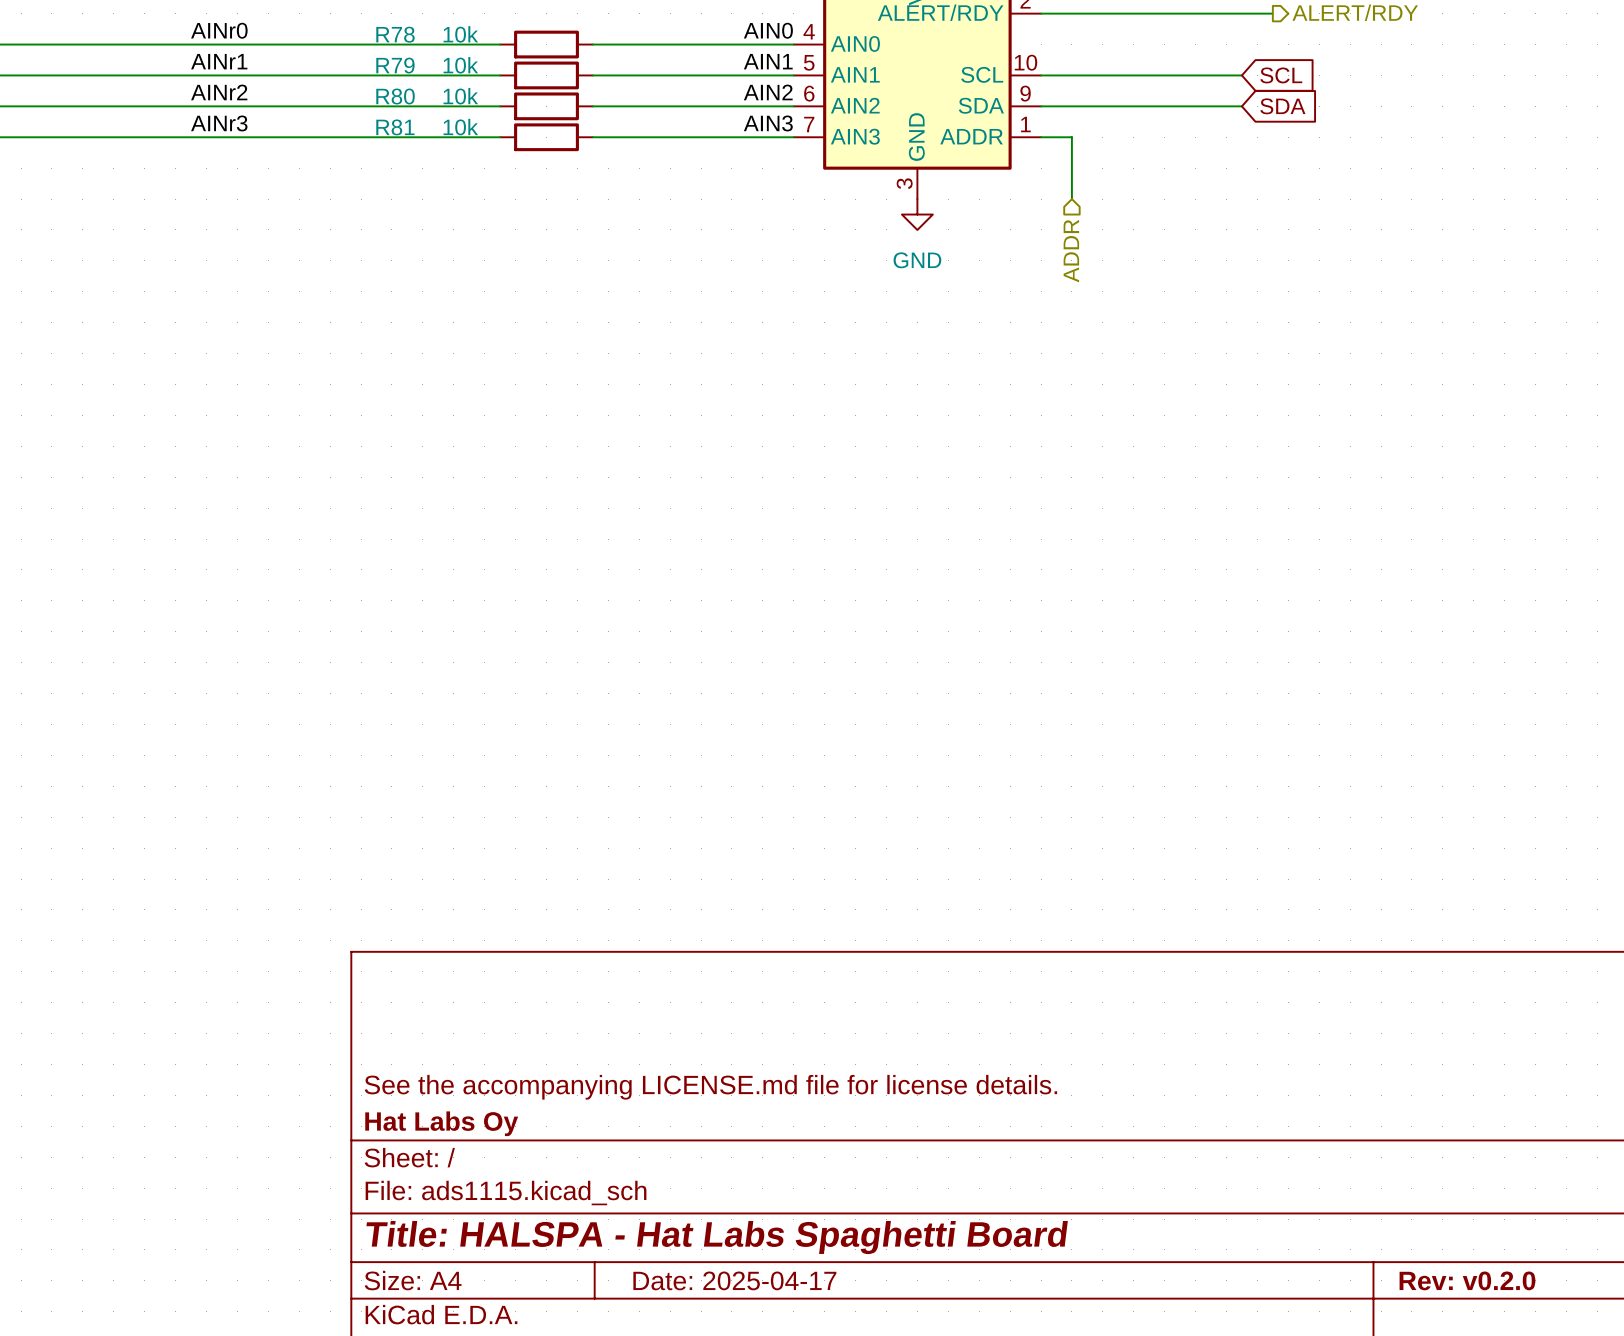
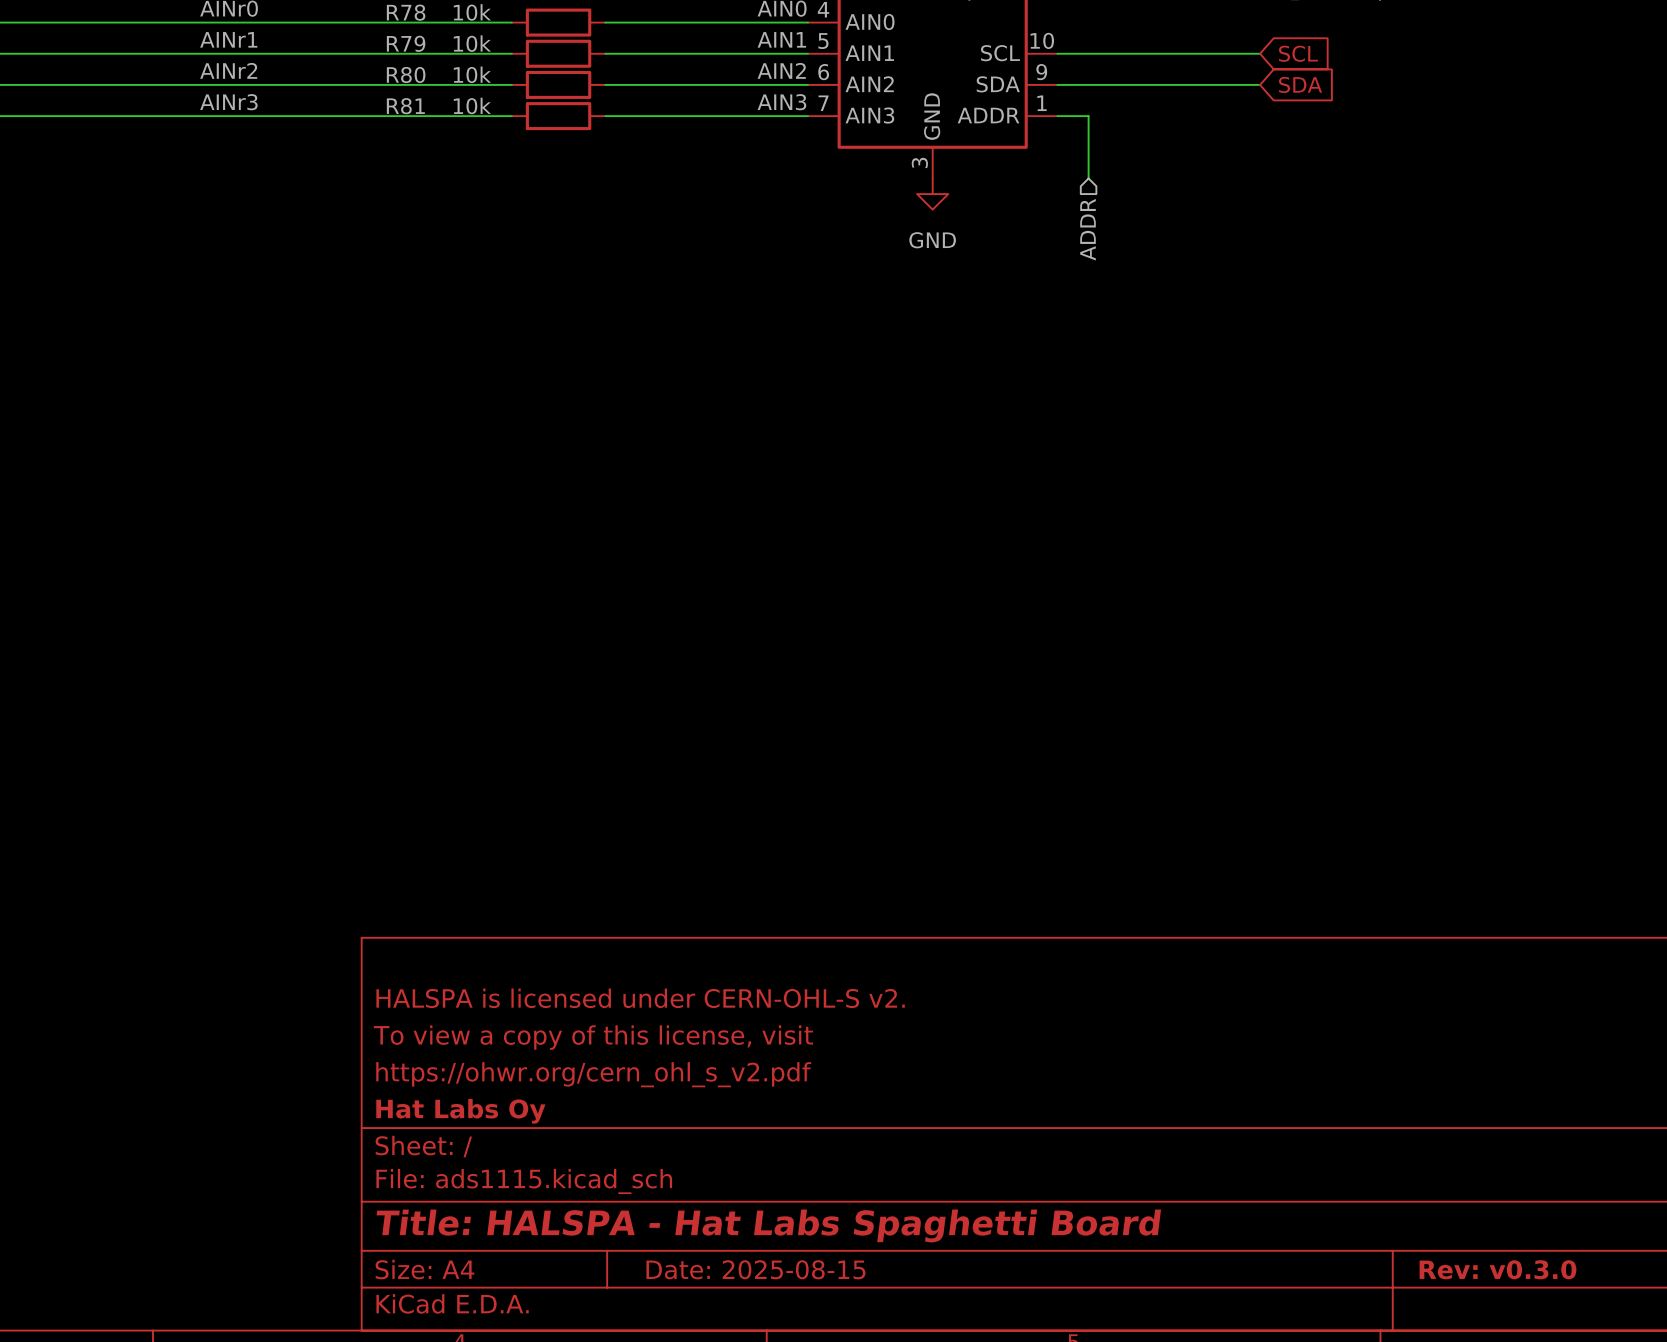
title block: none -> HALSPA is licensed under CERN-OHL-S v2. (640, 998)
title block: none -> To view a copy of this license, visit (593, 1037)
title block: See the accompanying LICENSE.md file for license details. (710, 1087) -> https://ohwr.org/cern_ohl_s_v2.pdf (593, 1074)
title block: Date: 2025-04-17 (734, 1280) -> Date: 2025-08-15 (755, 1269)
title block: Rev: v0.2.0 (1467, 1280) -> Rev: v0.3.0 (1498, 1269)

